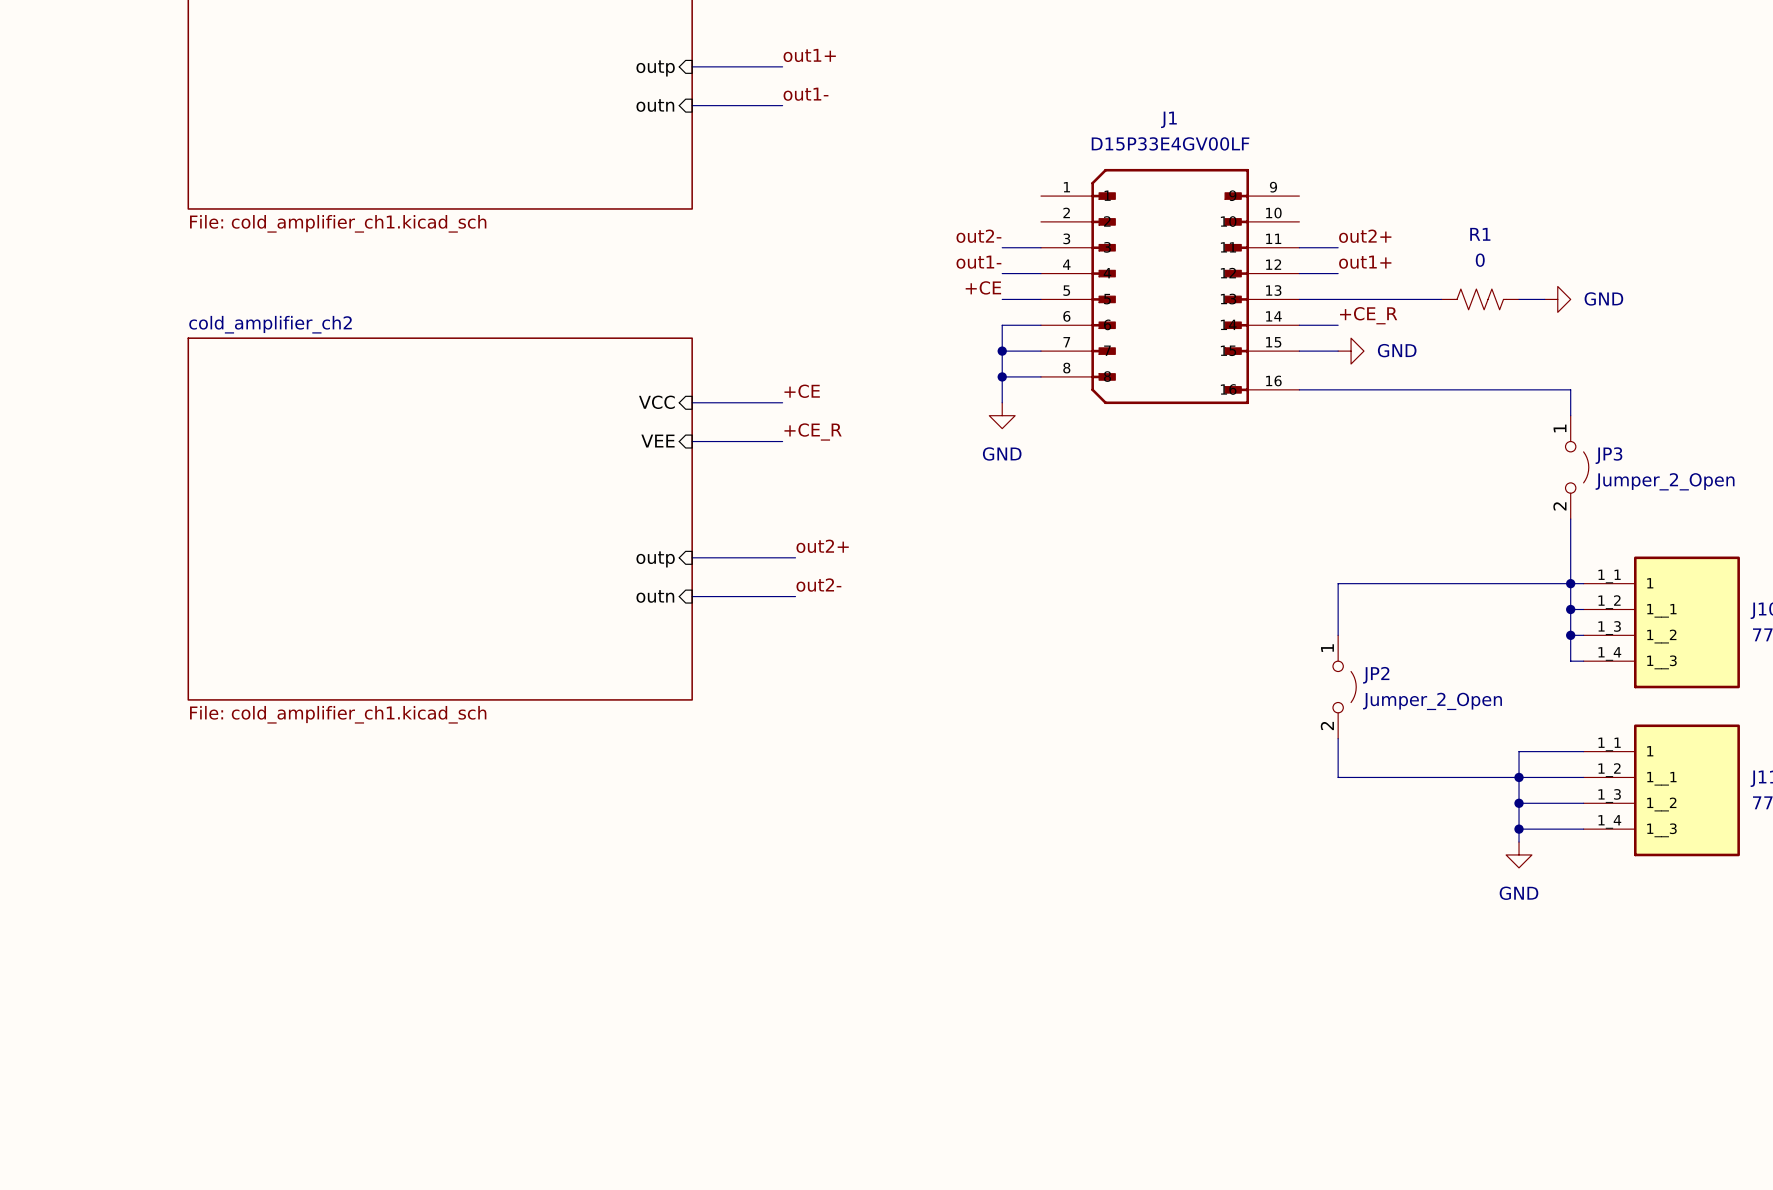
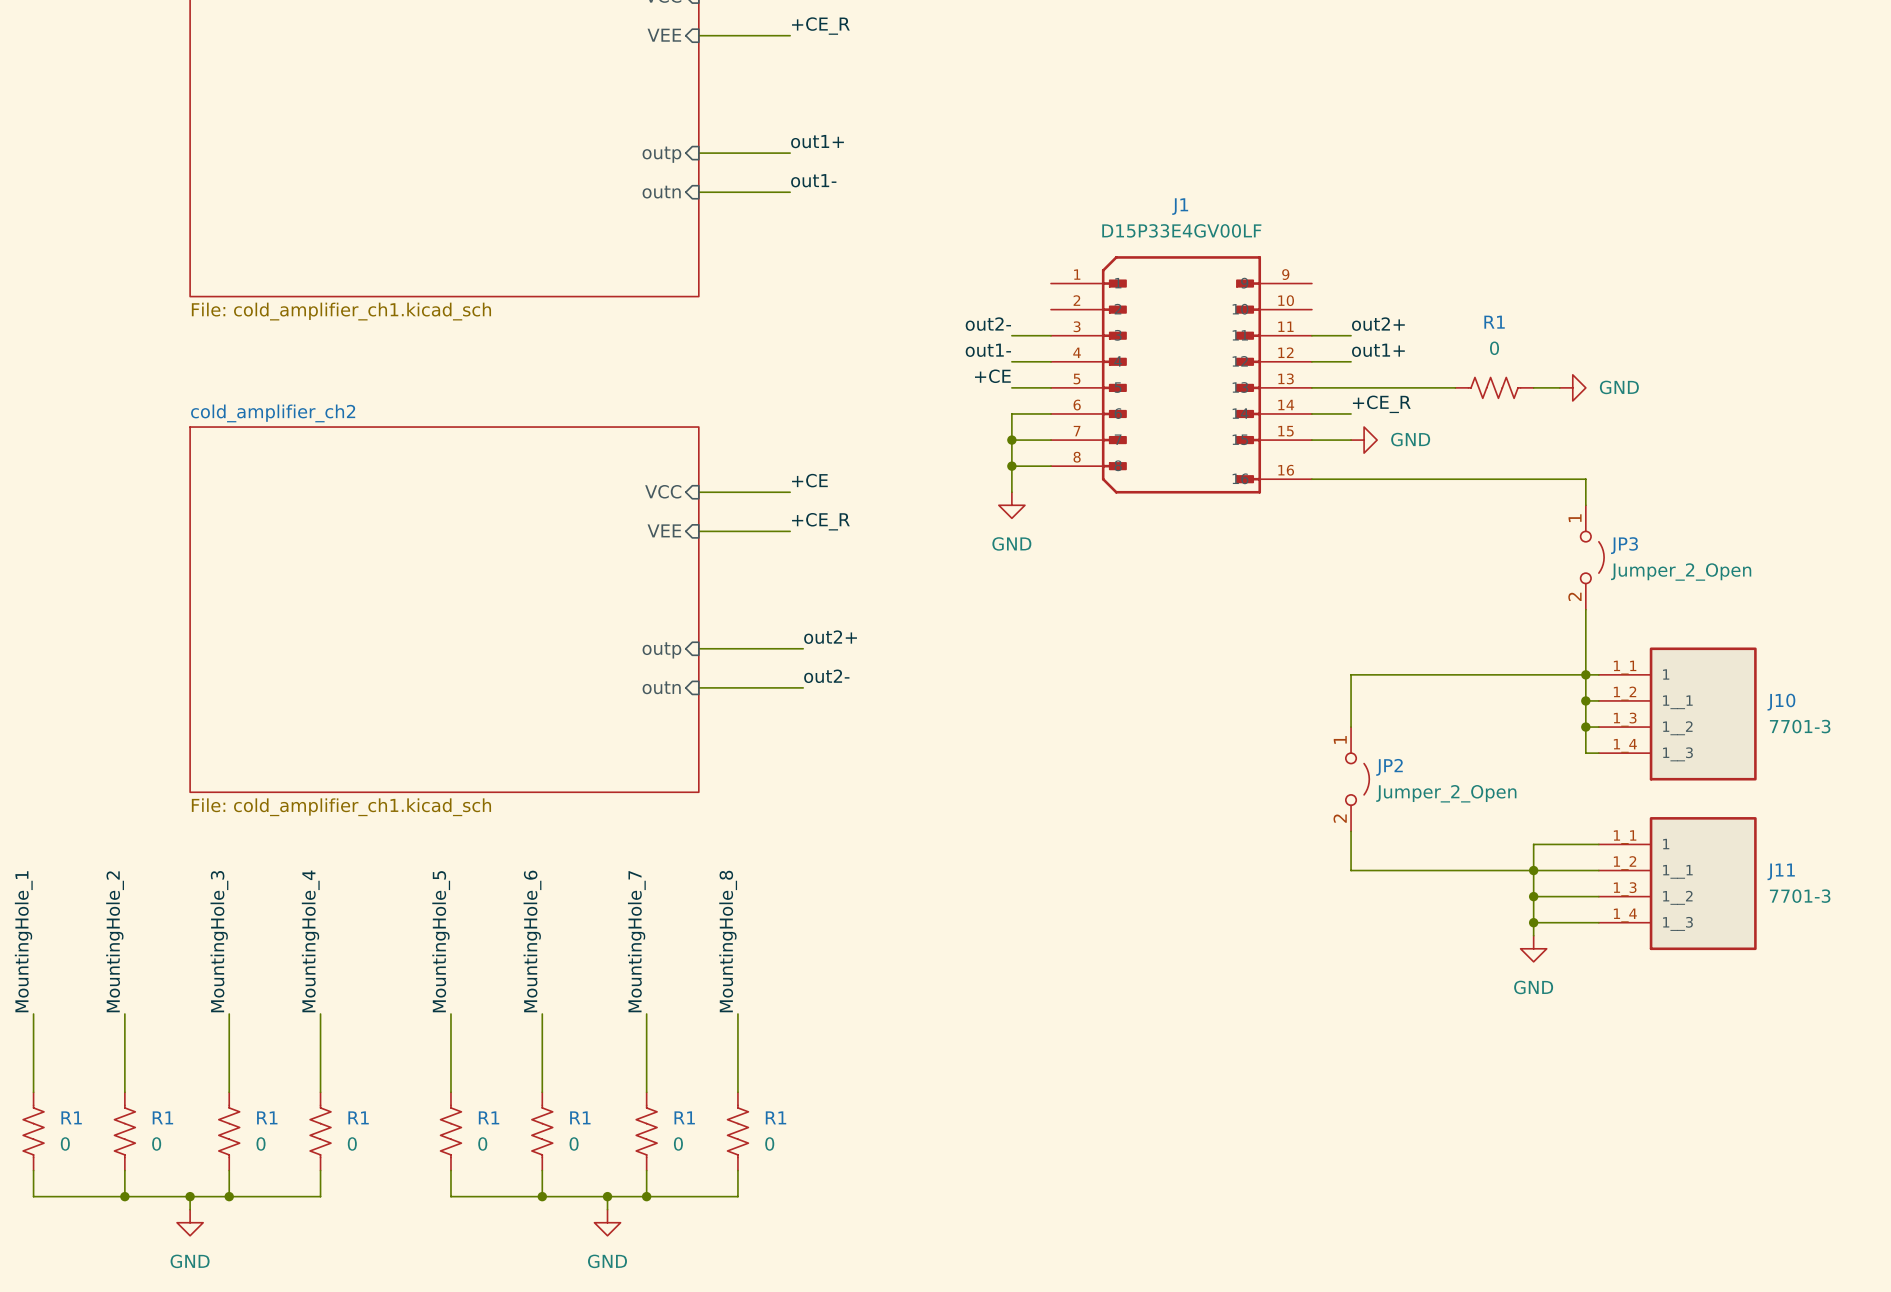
label: none -> MountingHole_1 (23, 941)
label: none -> MountingHole_3 (219, 941)
label: none -> MountingHole_4 (310, 941)
label: none -> MountingHole_5 (441, 941)
label: none -> MountingHole_6 (532, 941)
label: none -> MountingHole_7 (636, 941)
label: none -> MountingHole_8 (728, 941)
label: none -> MountingHole_2 (115, 941)
wire: none -> (33, 1014) (33, 1092)
wire: none -> (124, 1014) (124, 1092)
wire: none -> (229, 1014) (229, 1092)
wire: none -> (320, 1014) (320, 1092)
wire: none -> (450, 1014) (450, 1092)
wire: none -> (542, 1014) (542, 1092)
wire: none -> (646, 1014) (646, 1092)
wire: none -> (737, 1014) (737, 1092)
R1: none -> 0 (33, 1131)
R1: none -> 0 (124, 1131)
R1: none -> 0 (229, 1131)
R1: none -> 0 (320, 1131)
R1: none -> 0 (450, 1131)
R1: none -> 0 (542, 1131)
R1: none -> 0 (646, 1131)
R1: none -> 0 (737, 1131)
wire: none -> (33, 1170) (33, 1196) (320, 1196) (320, 1170)
wire: none -> (124, 1170) (124, 1196)
wire: none -> (229, 1170) (229, 1196)
wire: none -> (450, 1170) (450, 1196) (737, 1196) (737, 1170)
wire: none -> (542, 1170) (542, 1196)
wire: none -> (646, 1170) (646, 1196)
junction: none -> (124, 1196)
wire: none -> (190, 1196) (190, 1209)
junction: none -> (190, 1196)
junction: none -> (229, 1196)
junction: none -> (542, 1196)
wire: none -> (607, 1196) (607, 1209)
junction: none -> (607, 1196)
junction: none -> (646, 1196)
power symbol: none -> GND (190, 1222)
power symbol: none -> GND (607, 1222)

